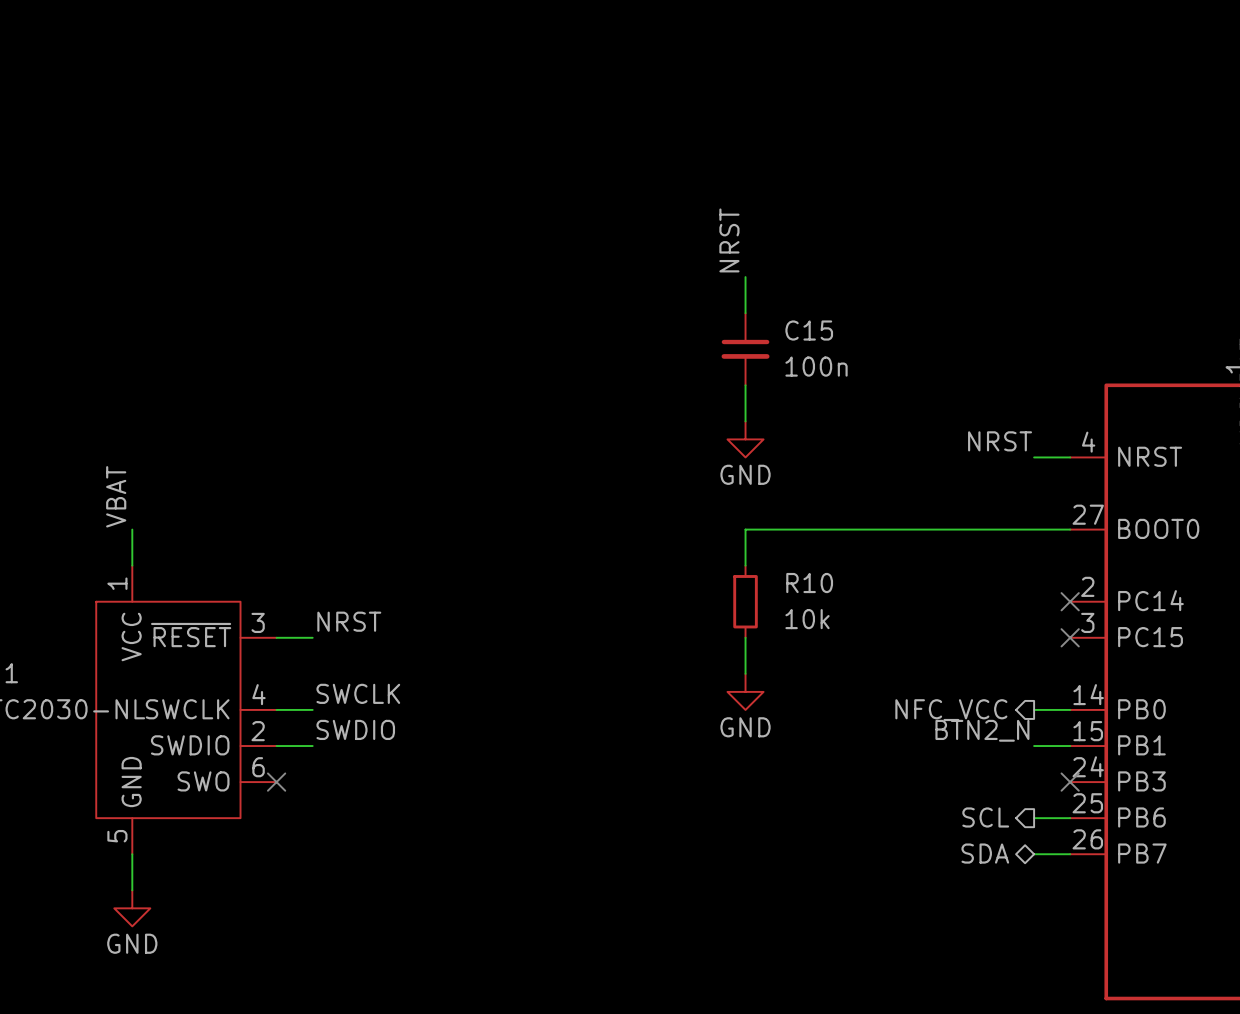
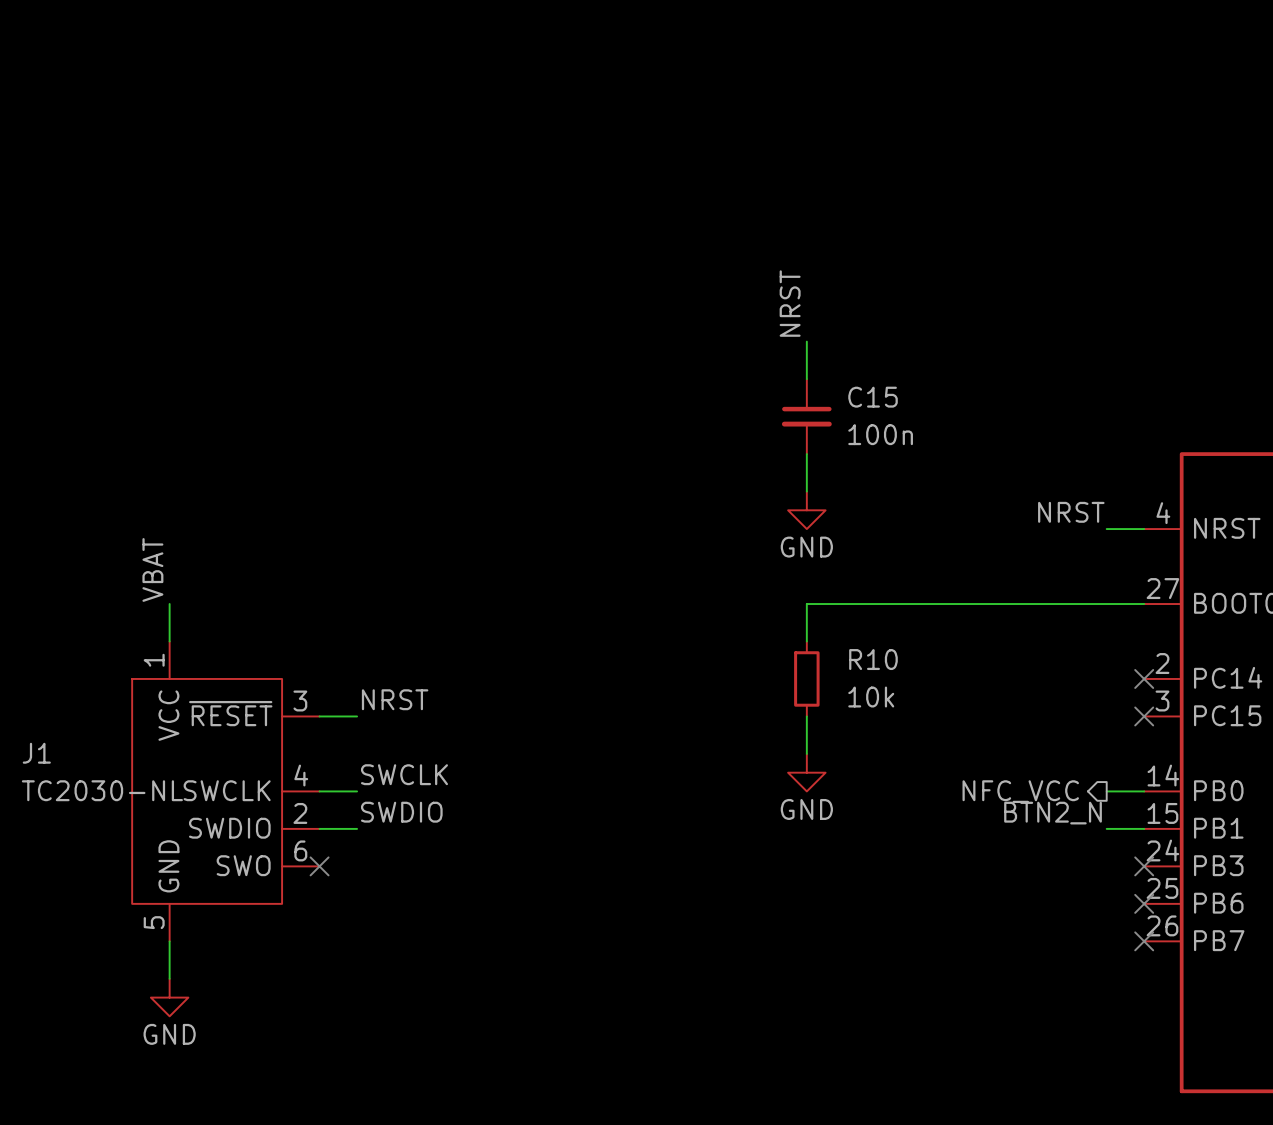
hierarchical label: SCL (985, 817) -> none
wire: (1034, 818) (1070, 818) -> none
no-connect mark: none -> (1144, 903)
hierarchical label: SDA (985, 853) -> none
wire: (1034, 854) (1070, 854) -> none
no-connect mark: none -> (1144, 941)

